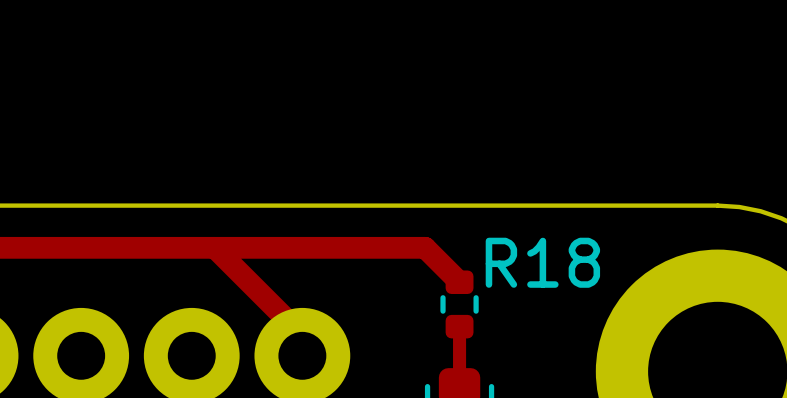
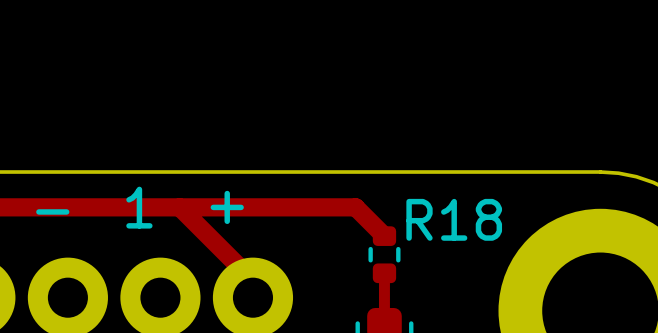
text: none -> + (227, 207)
text: none -> 1 (139, 207)
text: none -> - (52, 211)

